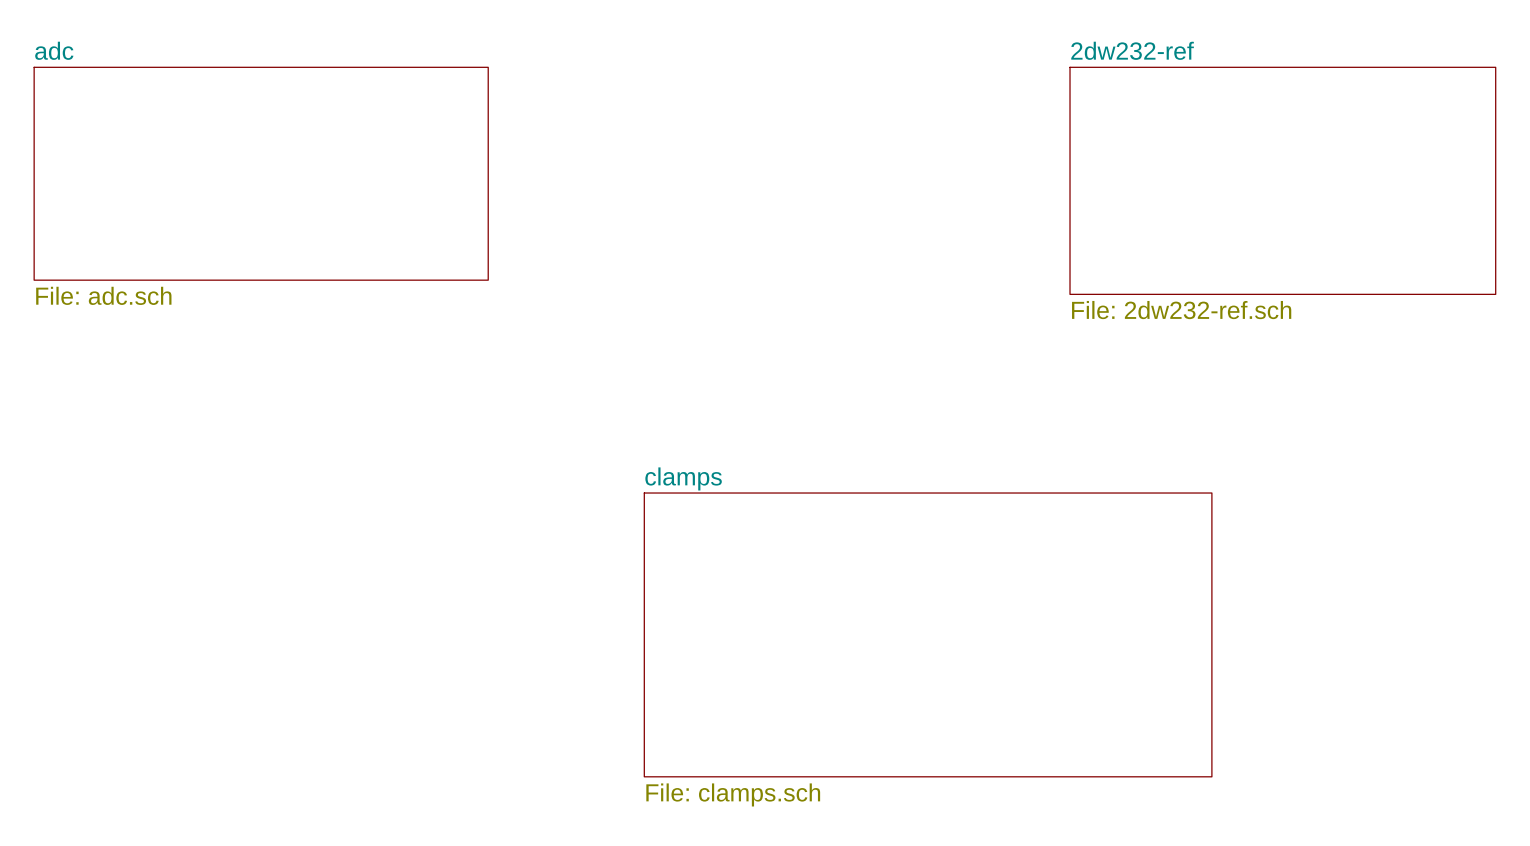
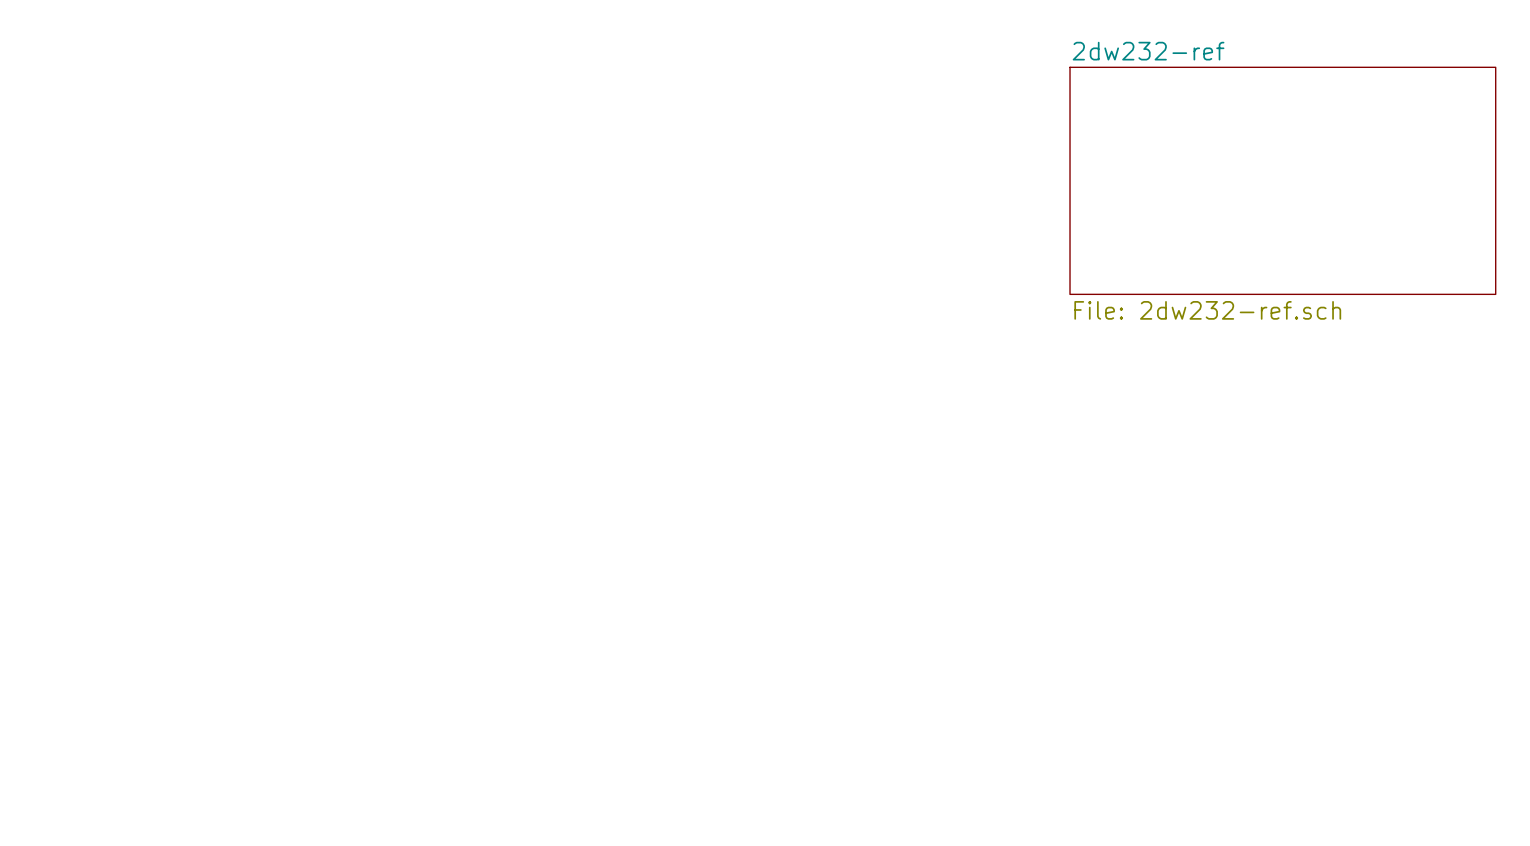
sheet adc: File: adc.sch (261, 173) -> none
sheet clamps: File: clamps.sch (928, 634) -> none

